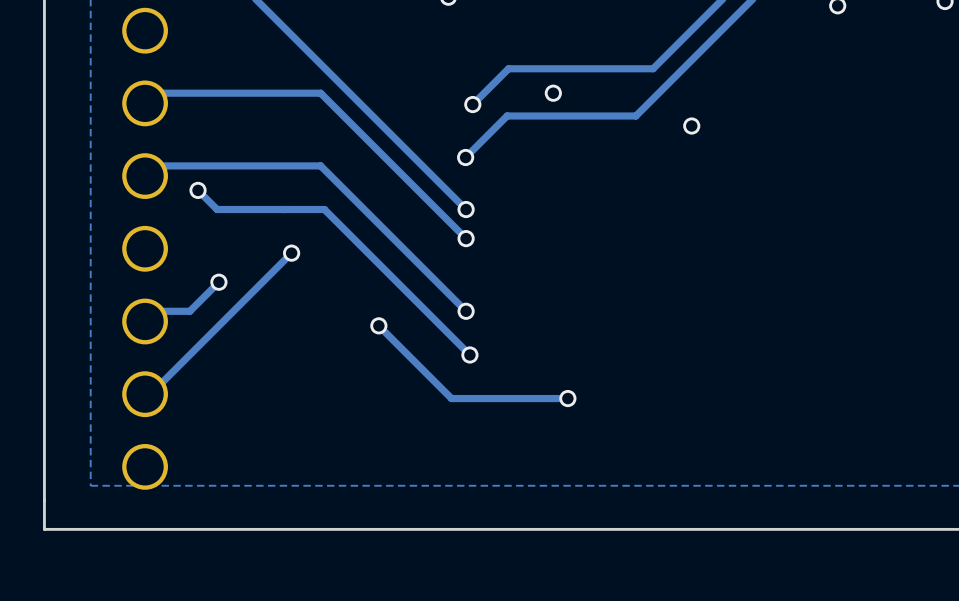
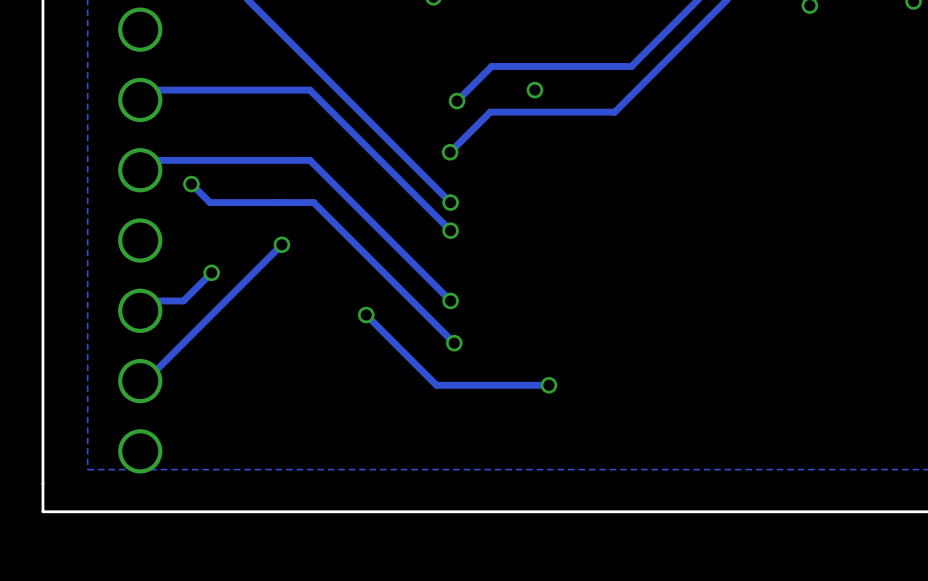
via: (691, 126) -> none

